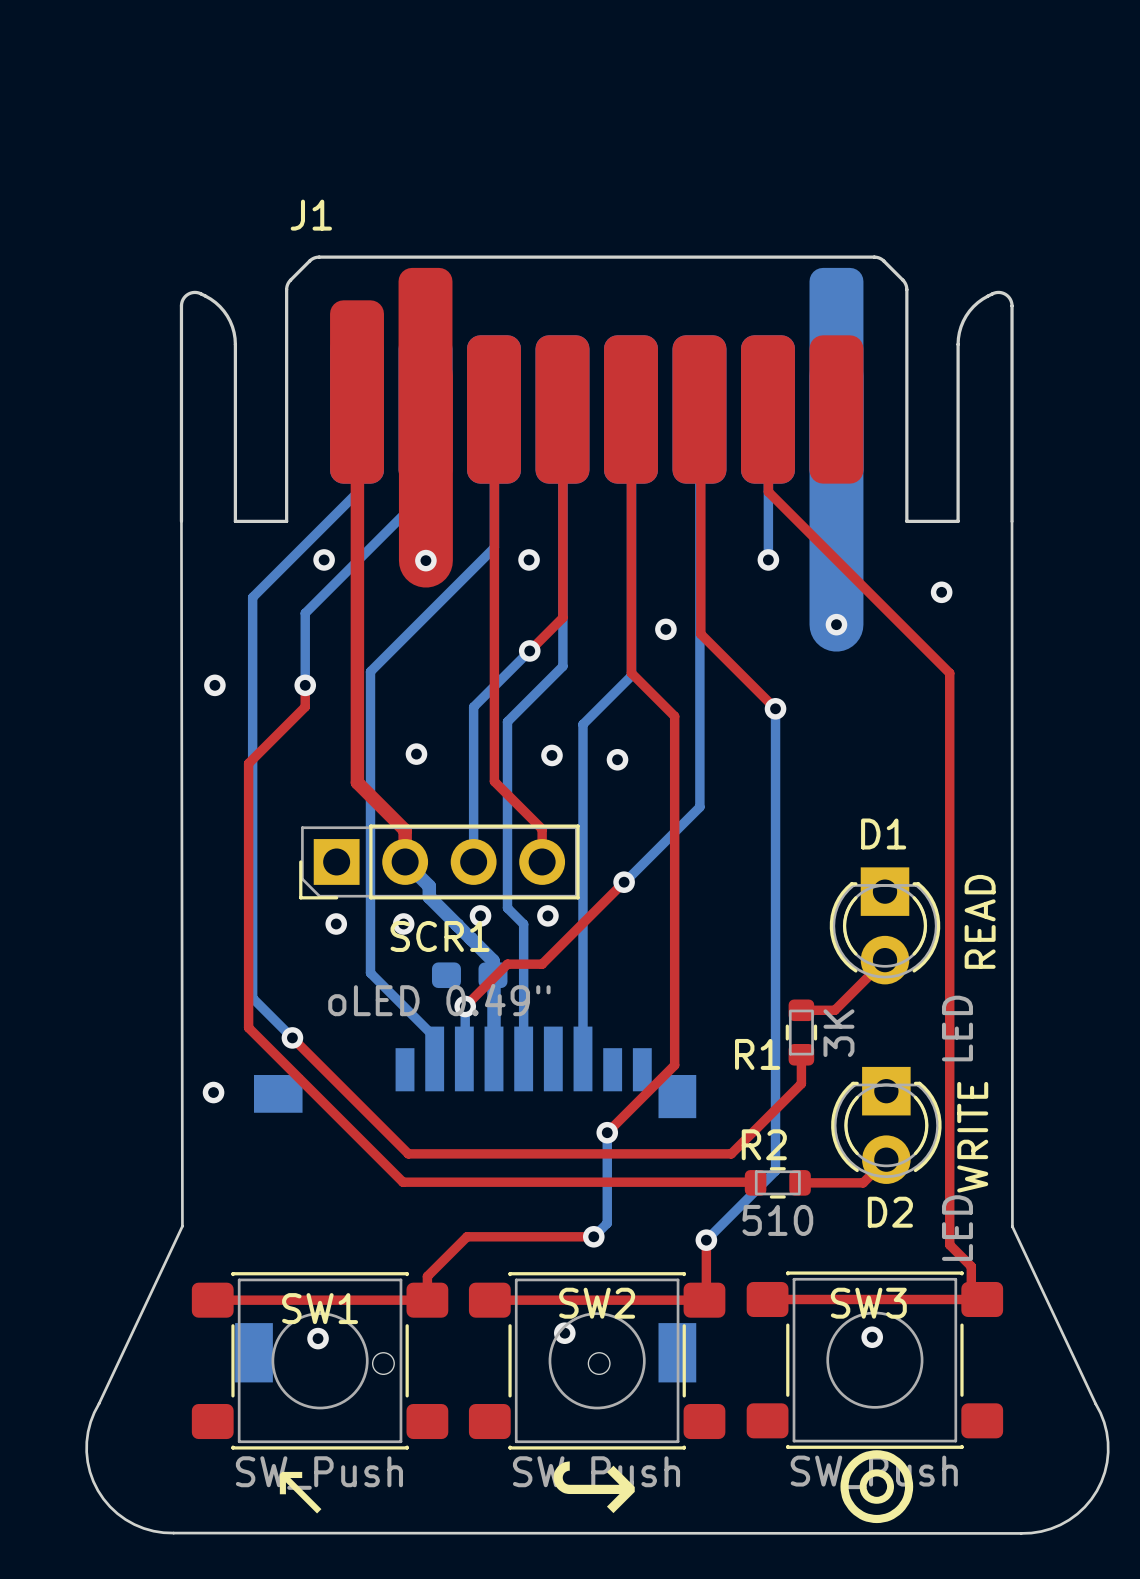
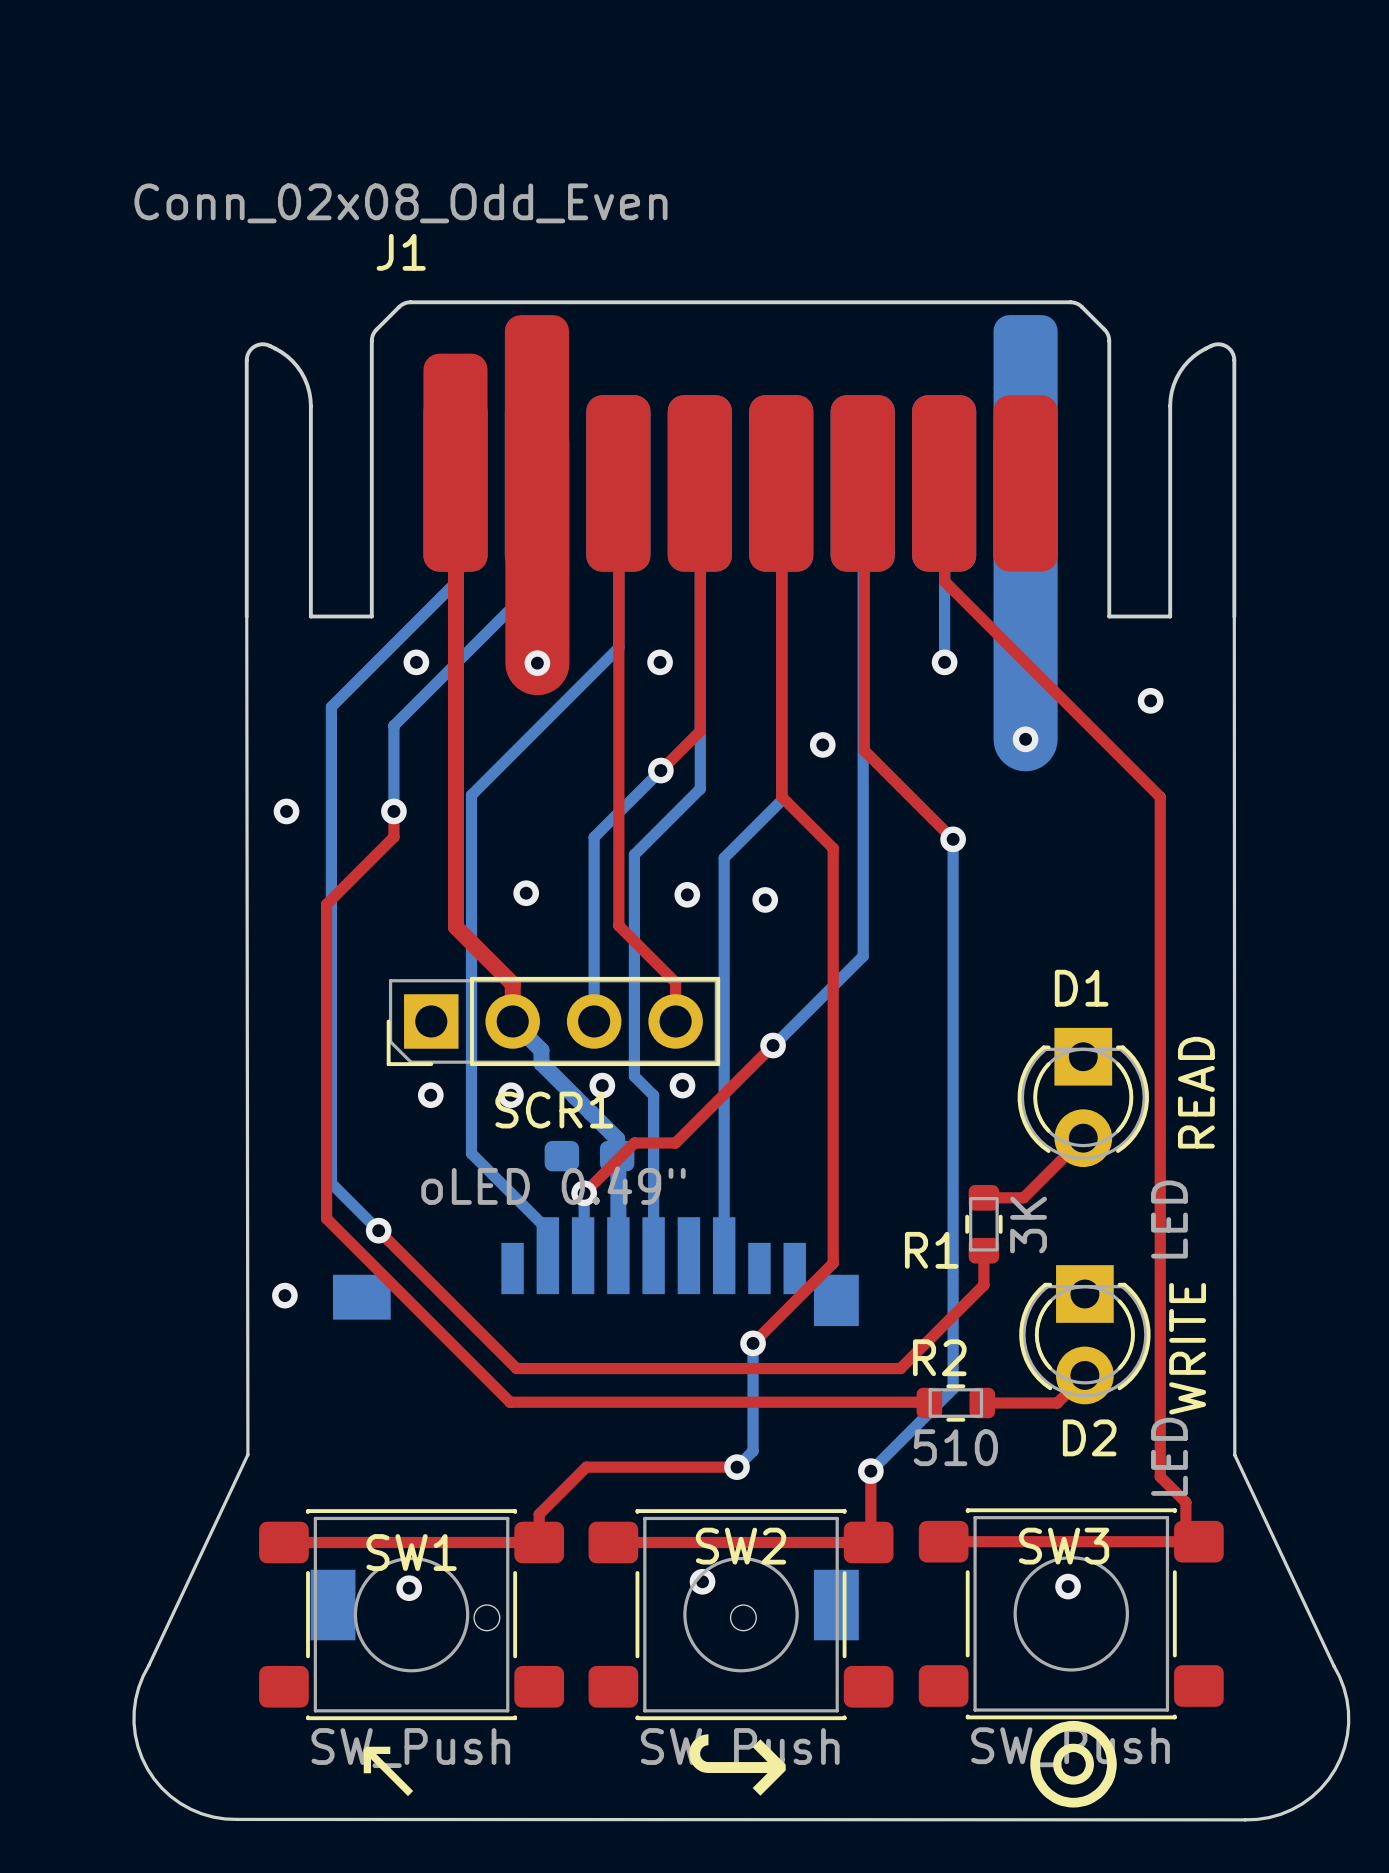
J1 value: none -> Conn_02x08_Odd_Even (400, 203)

